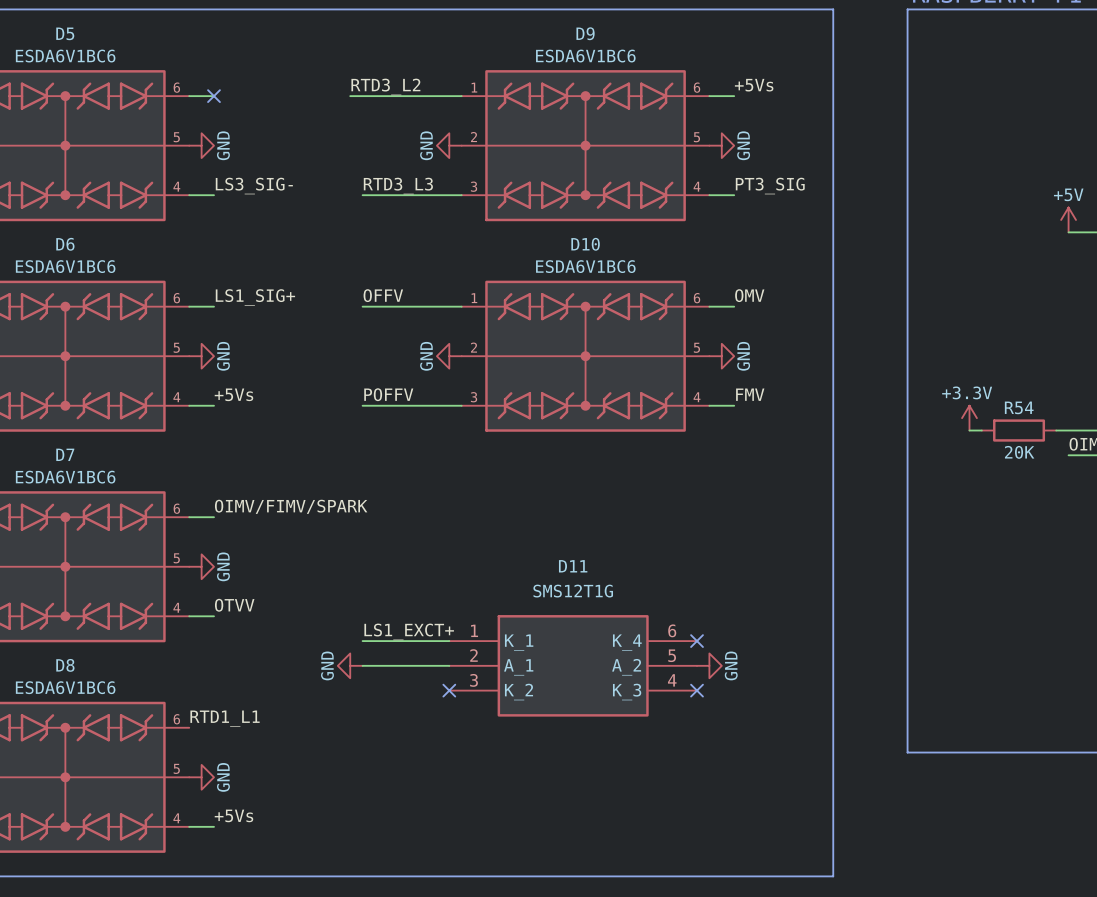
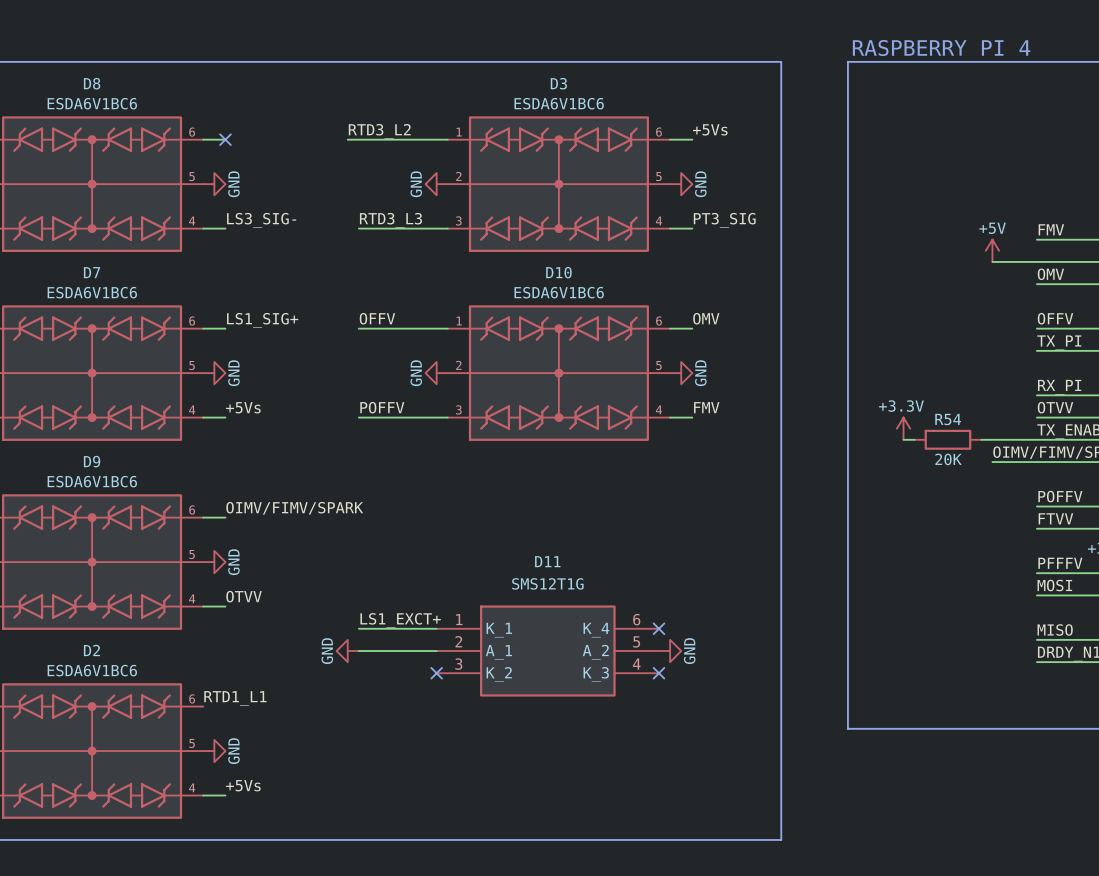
D5 name: D5 (65, 33) -> D8 (92, 83)
D9 name: D9 (585, 33) -> D3 (558, 83)
D6 name: D6 (65, 244) -> D7 (92, 272)
D7 name: D7 (65, 454) -> D9 (92, 461)
D8 name: D8 (65, 665) -> D2 (91, 650)

